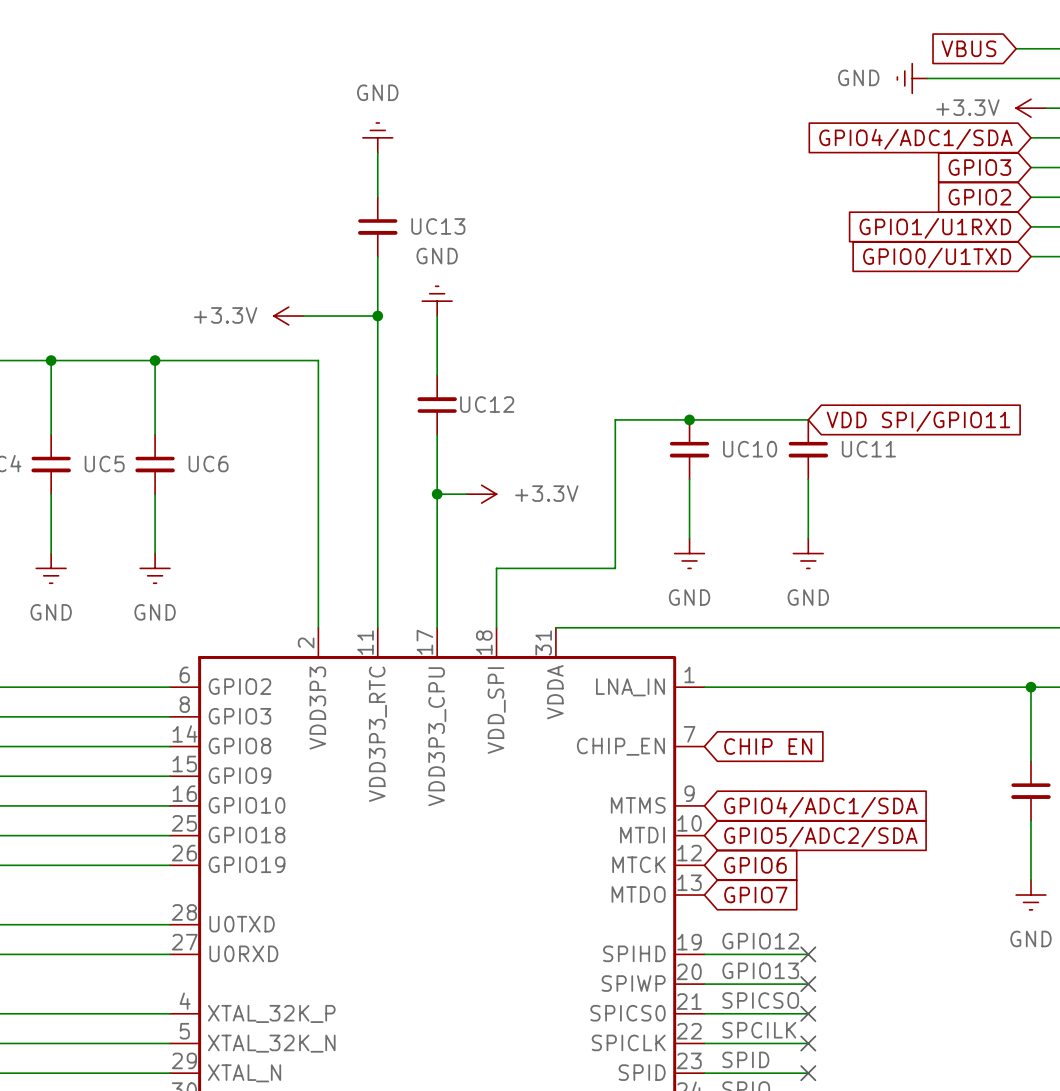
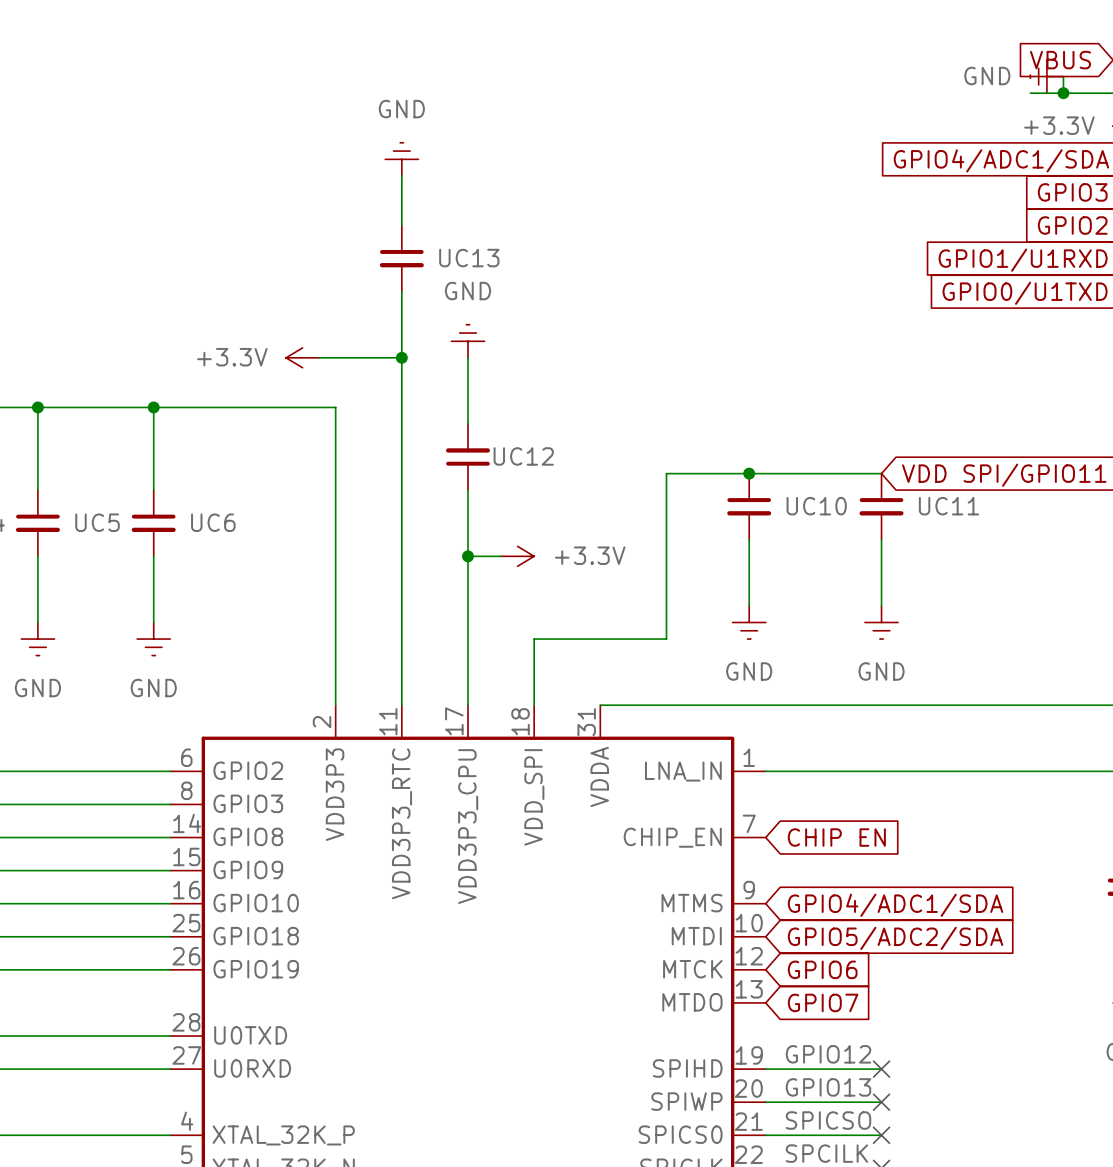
wire: none -> (1063, 76) (1063, 93)
power symbol position: GND (912, 78) -> GND (1046, 76)
wire: (927, 78) (941, 78) -> none
junction: none -> (1063, 93)

